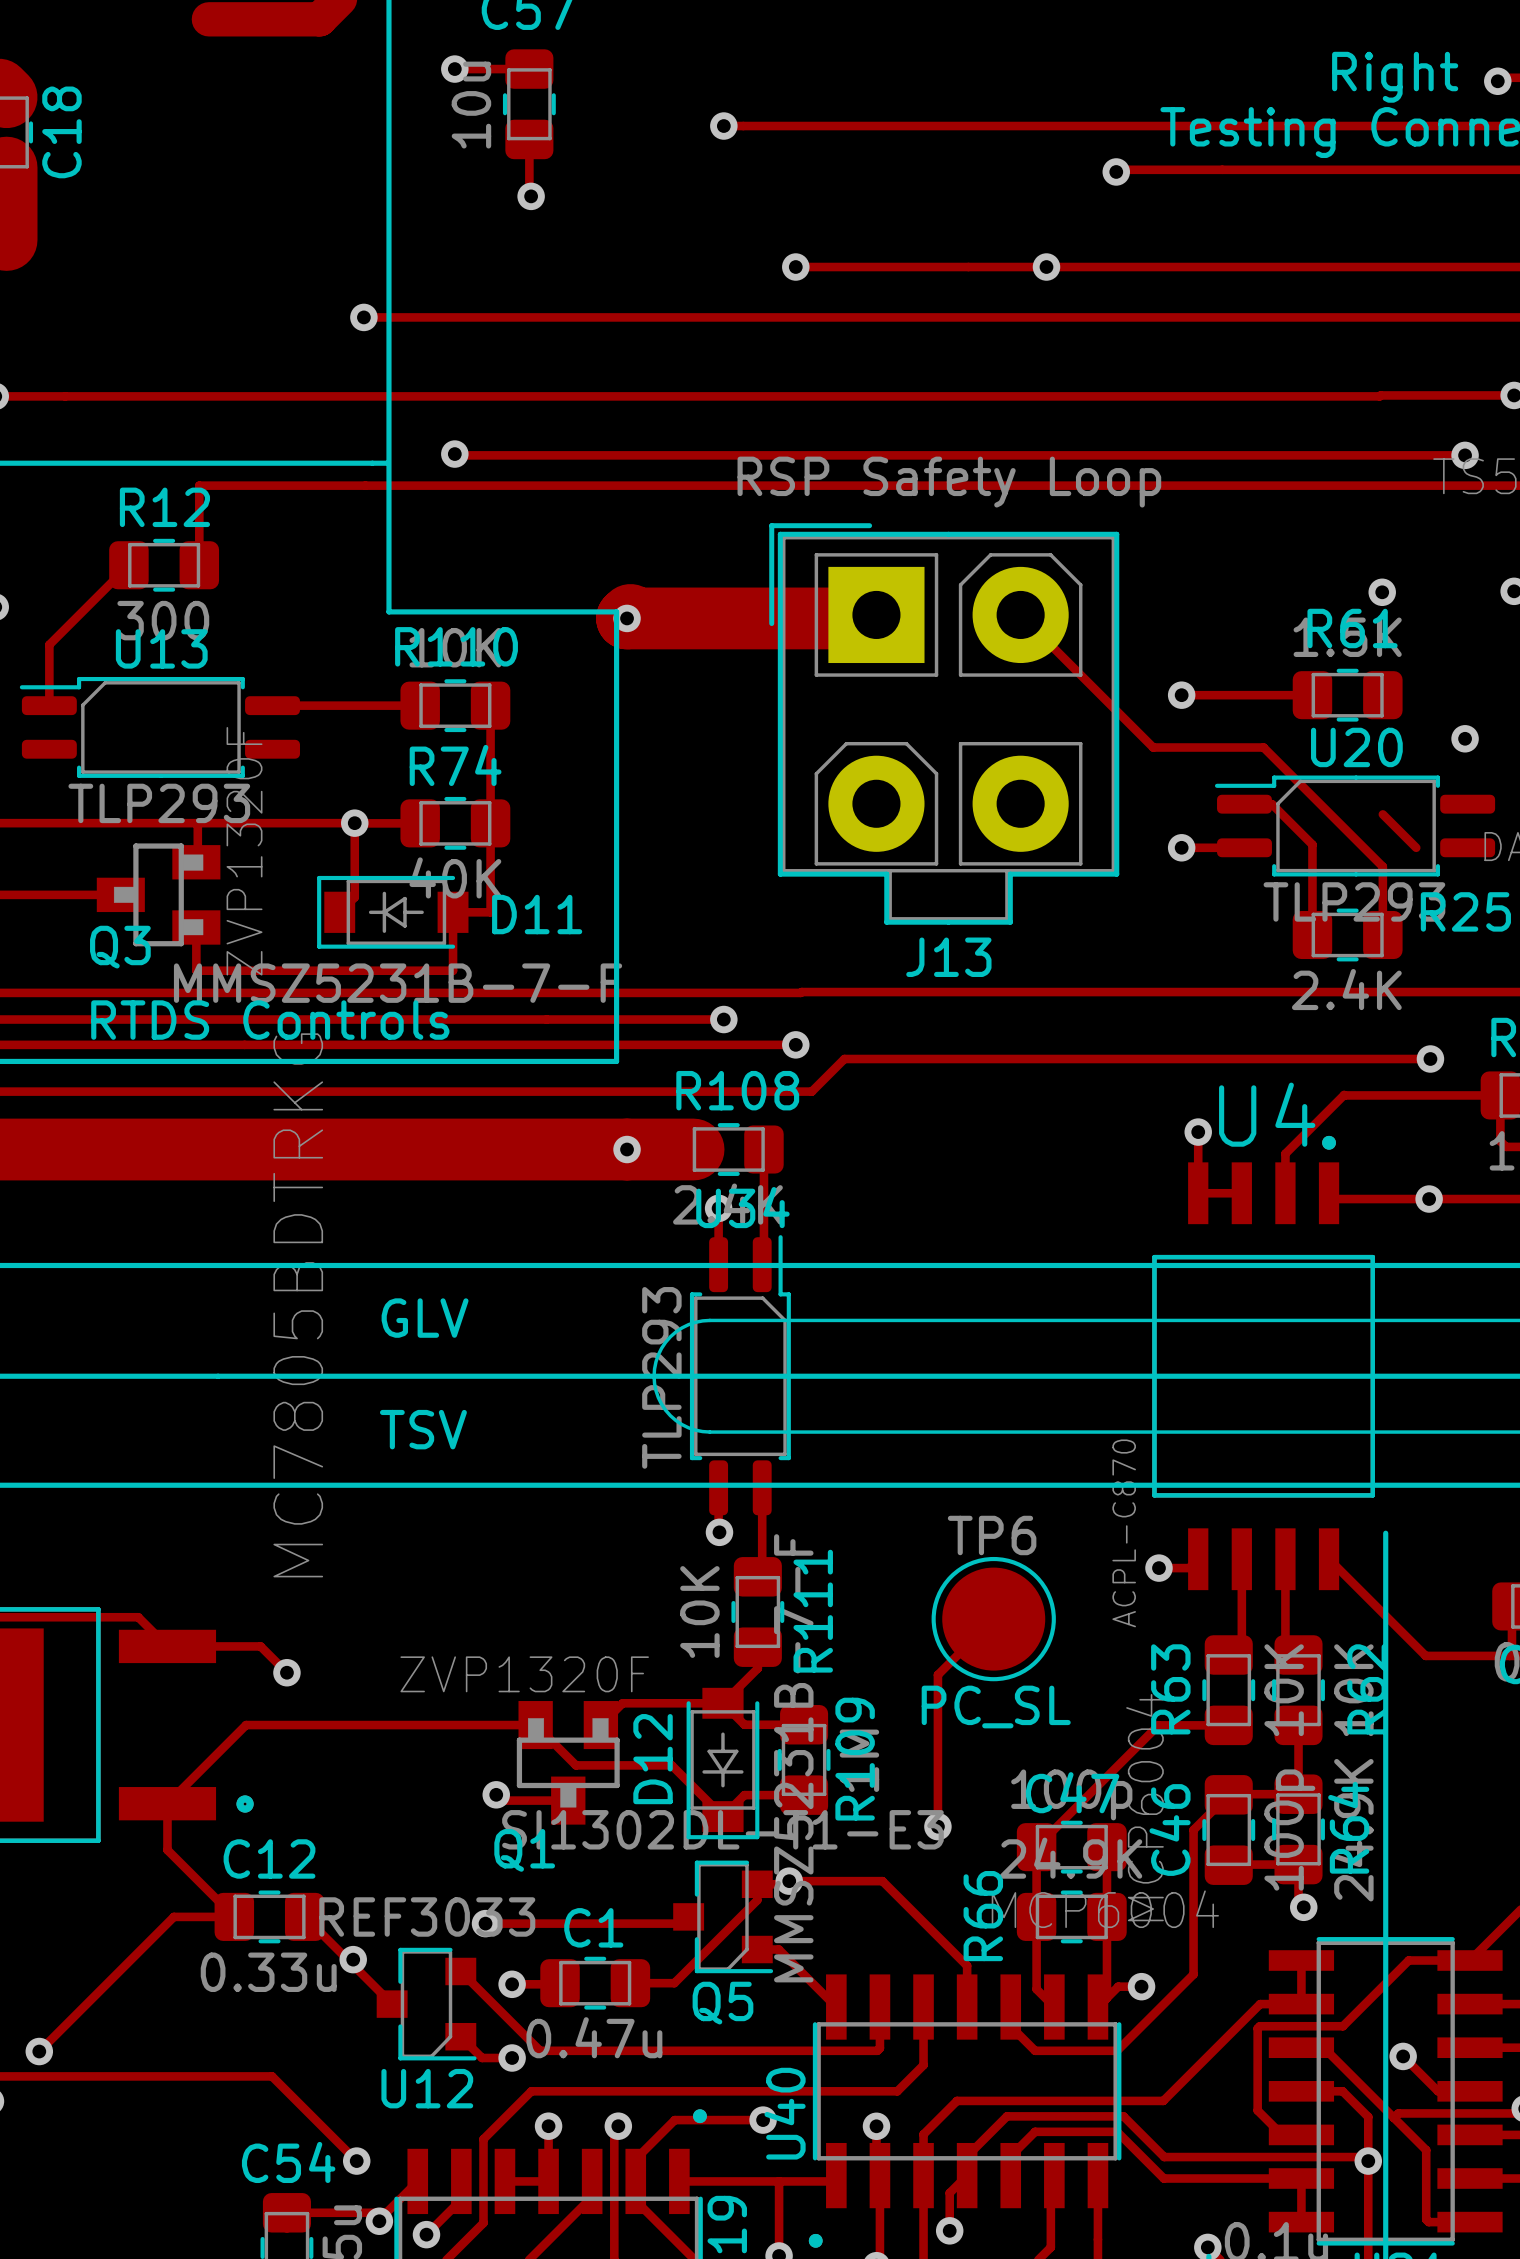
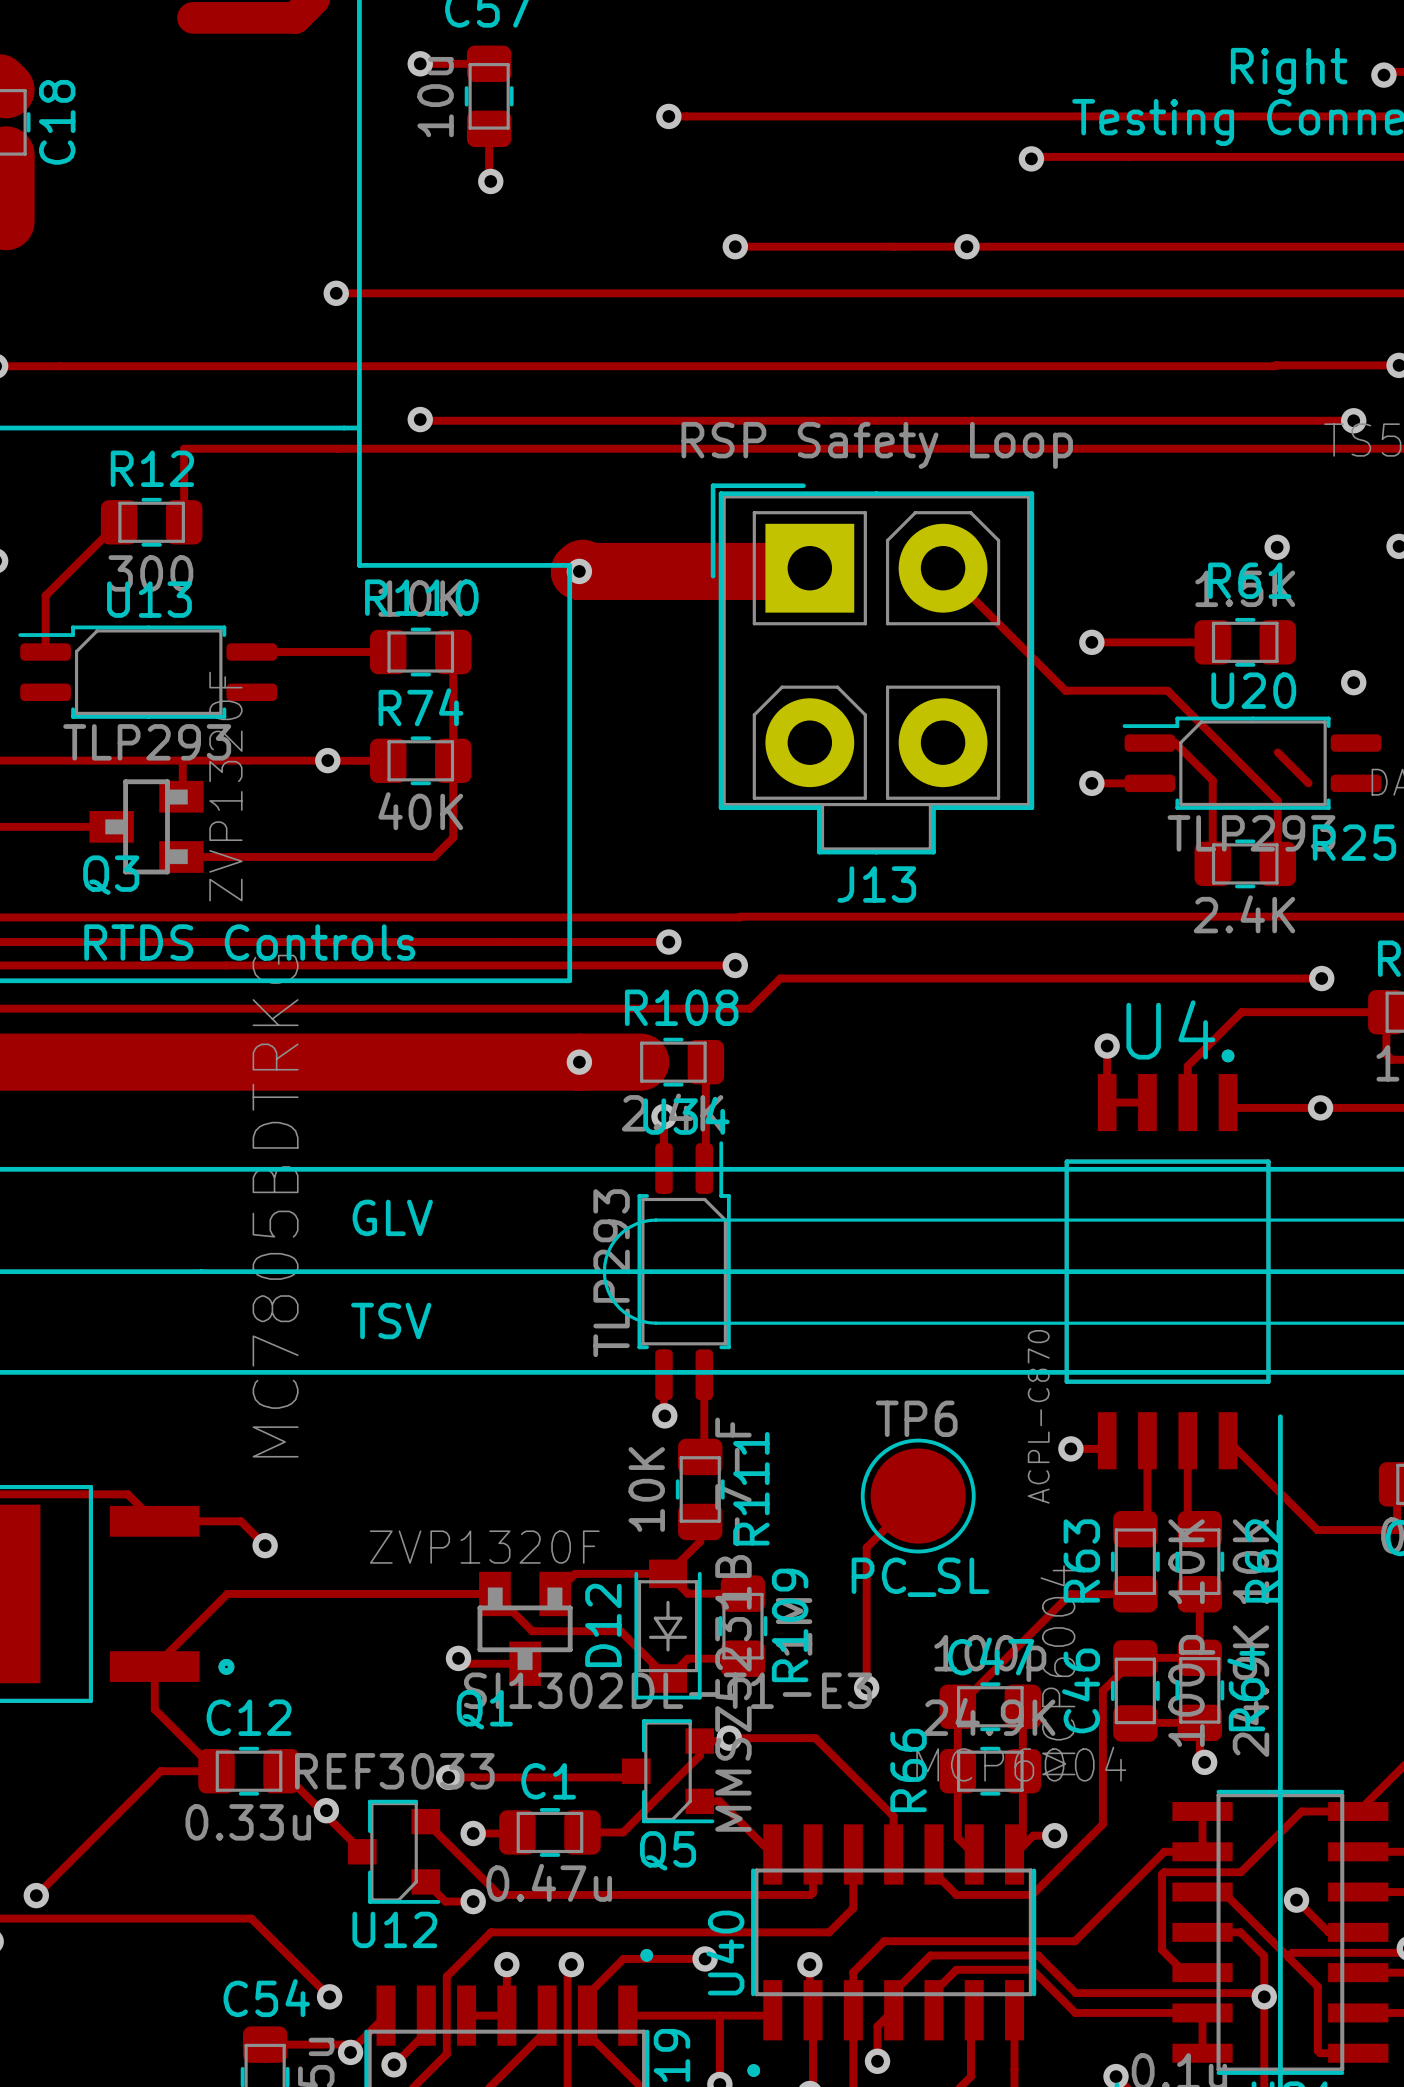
track: (354, 823) (354, 897) (339, 912) -> none
track: (490, 906) (490, 912) (453, 912) (453, 970) (196, 970) (196, 927) -> (453, 837) (434, 857) (181, 857)
D11: MMSZ5231B-7-F (392, 912) -> none

